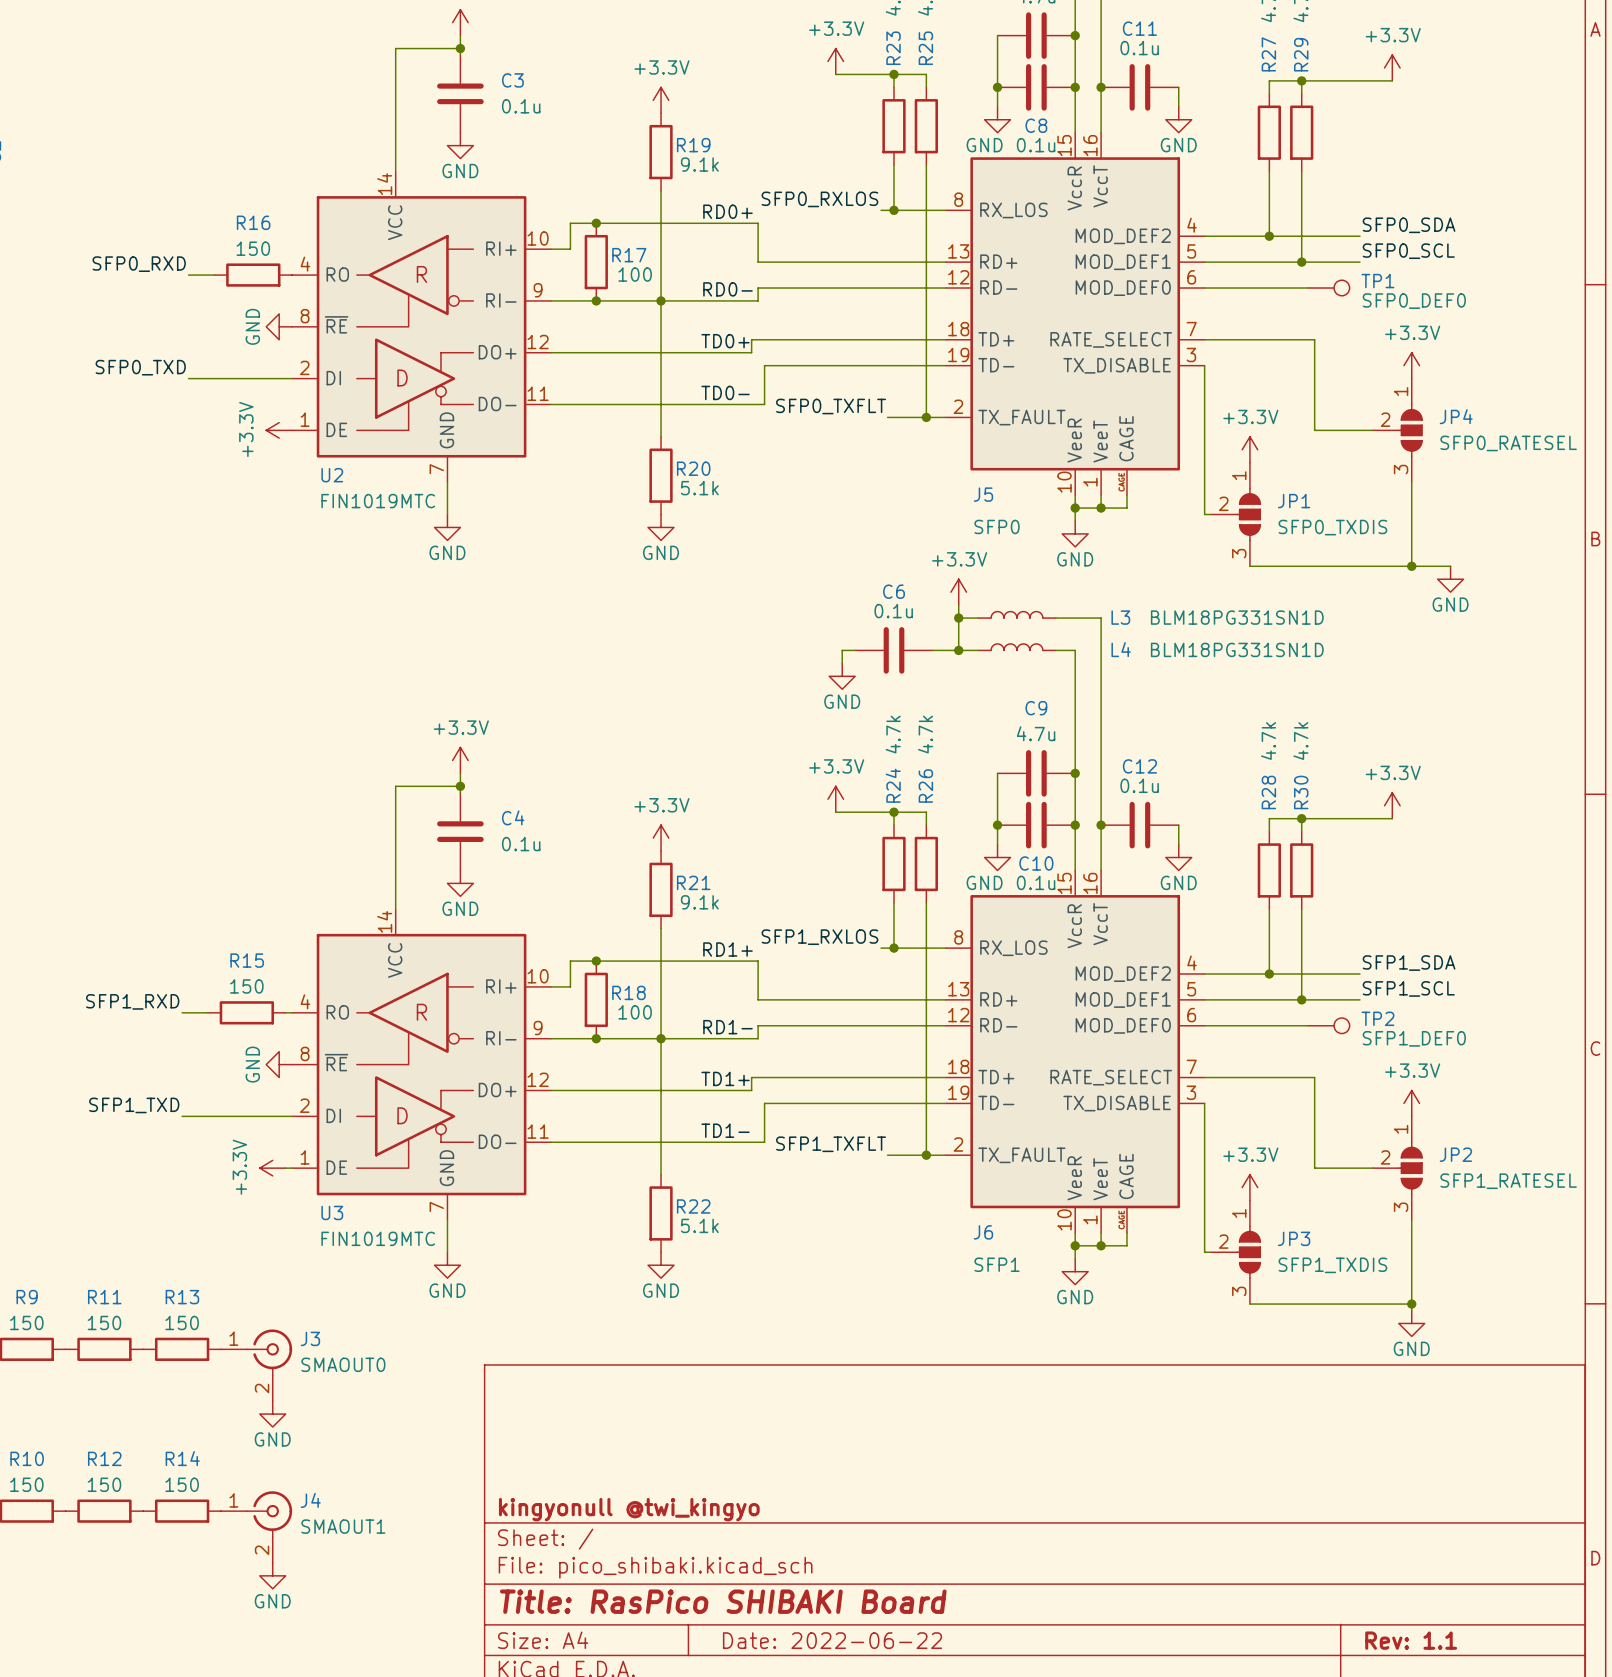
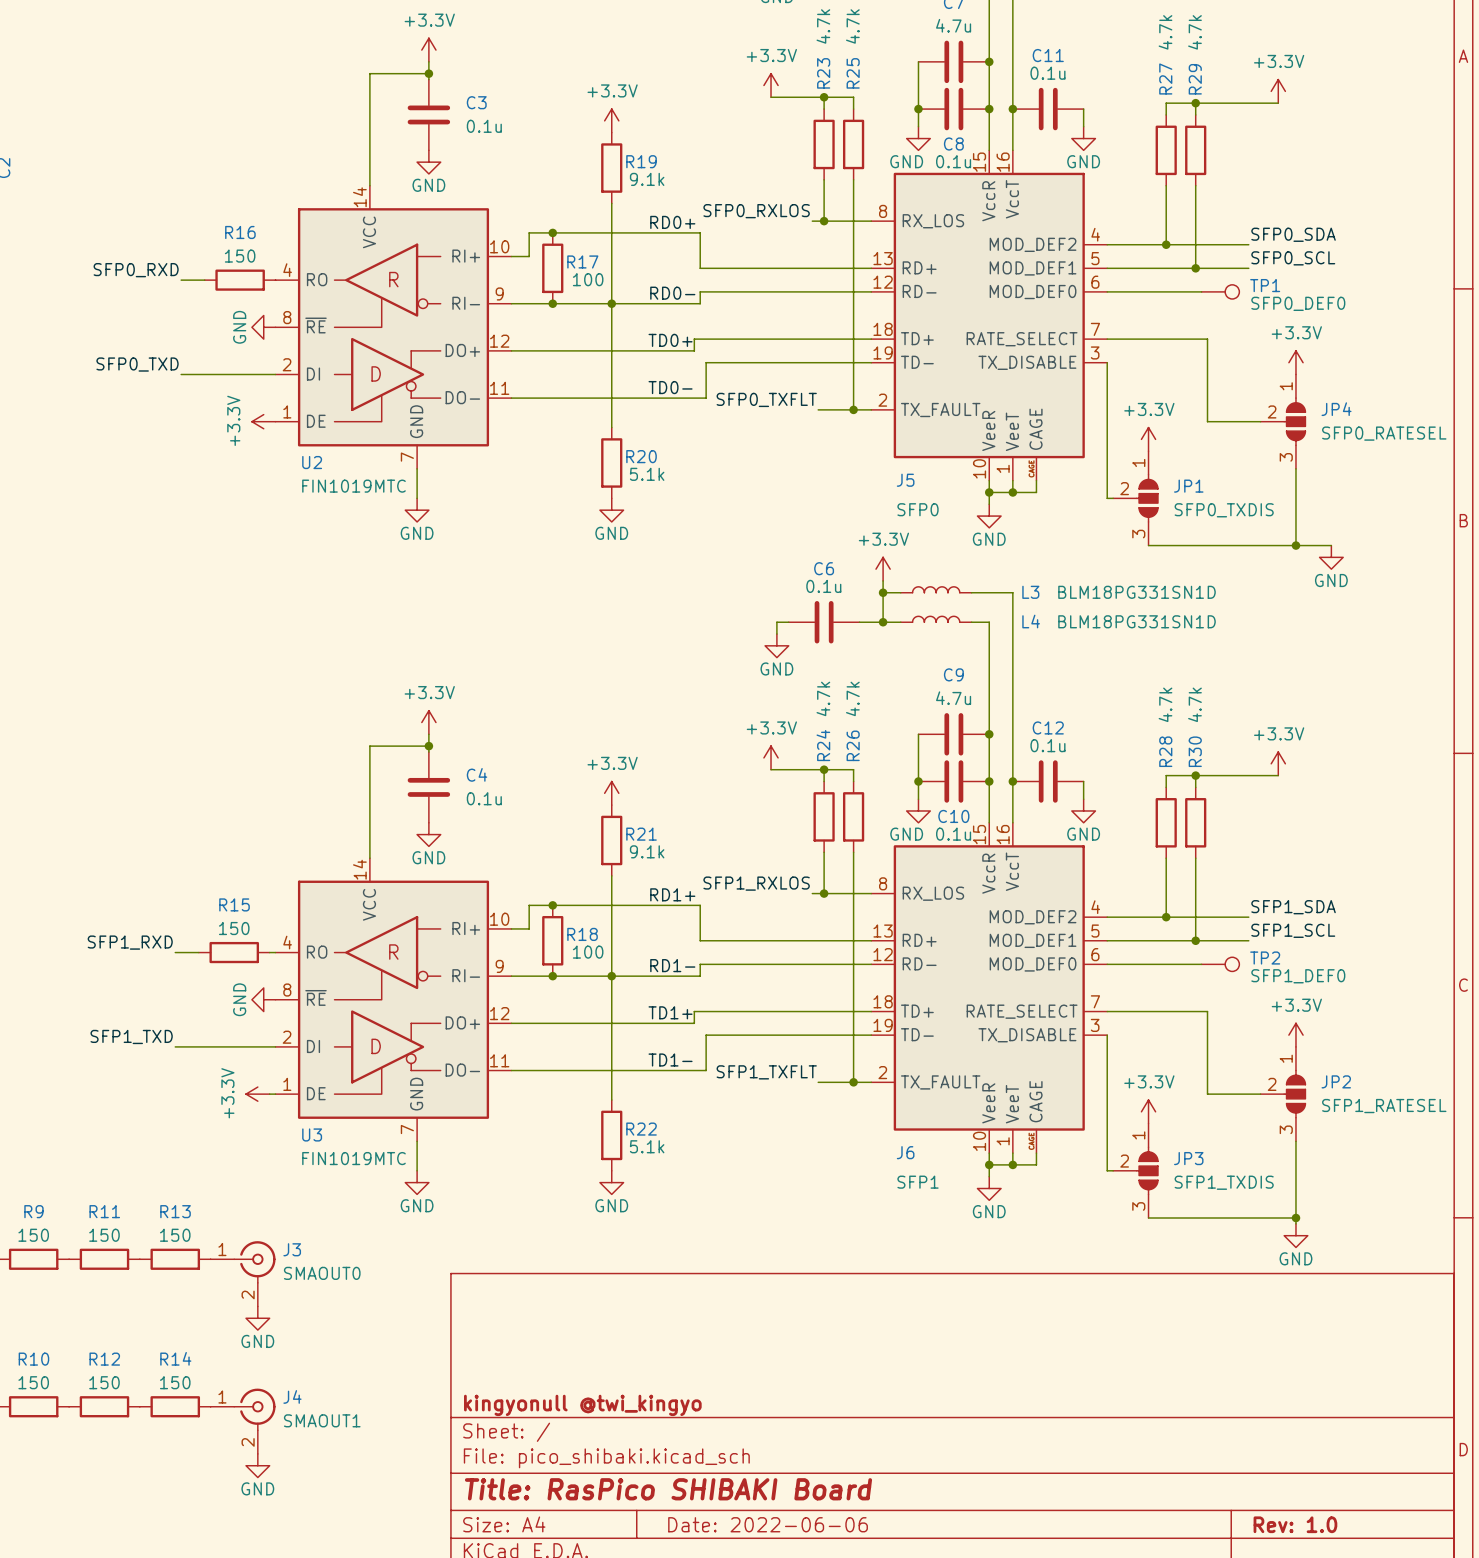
title block: Date: 2022-06-22 (832, 1640) -> Date: 2022-06-06 (768, 1524)
title block: Rev: 1.1 (1411, 1640) -> Rev: 1.0 (1295, 1524)

